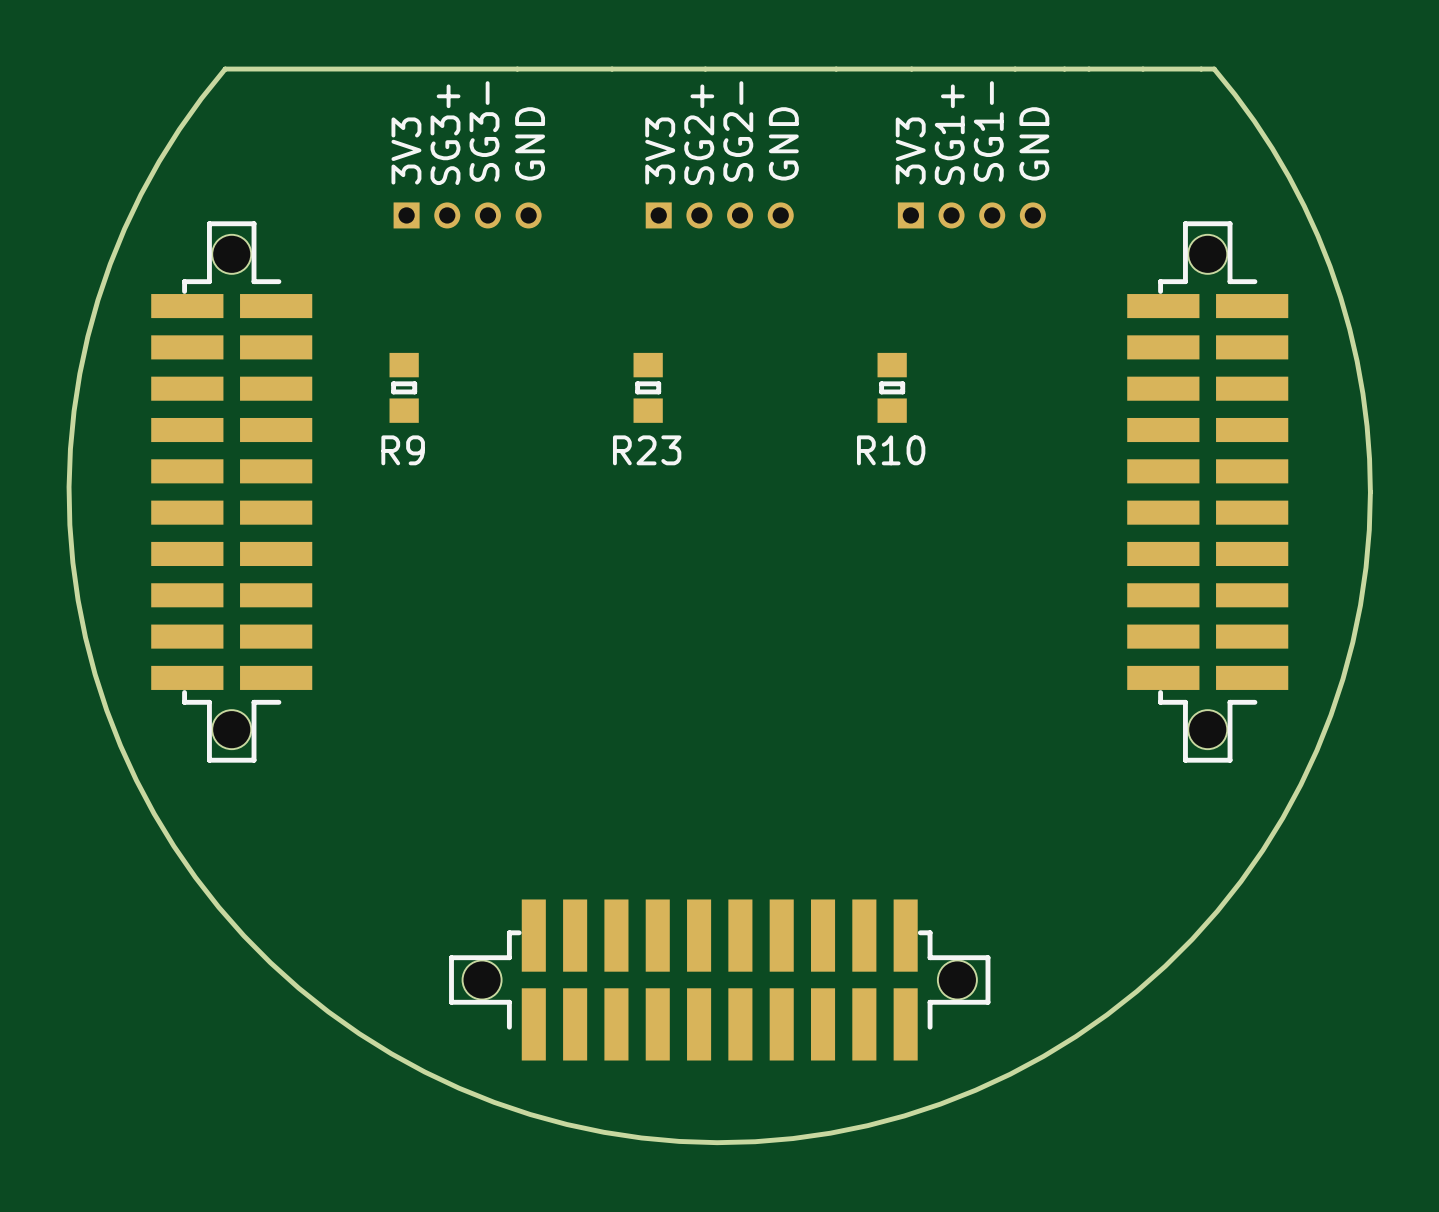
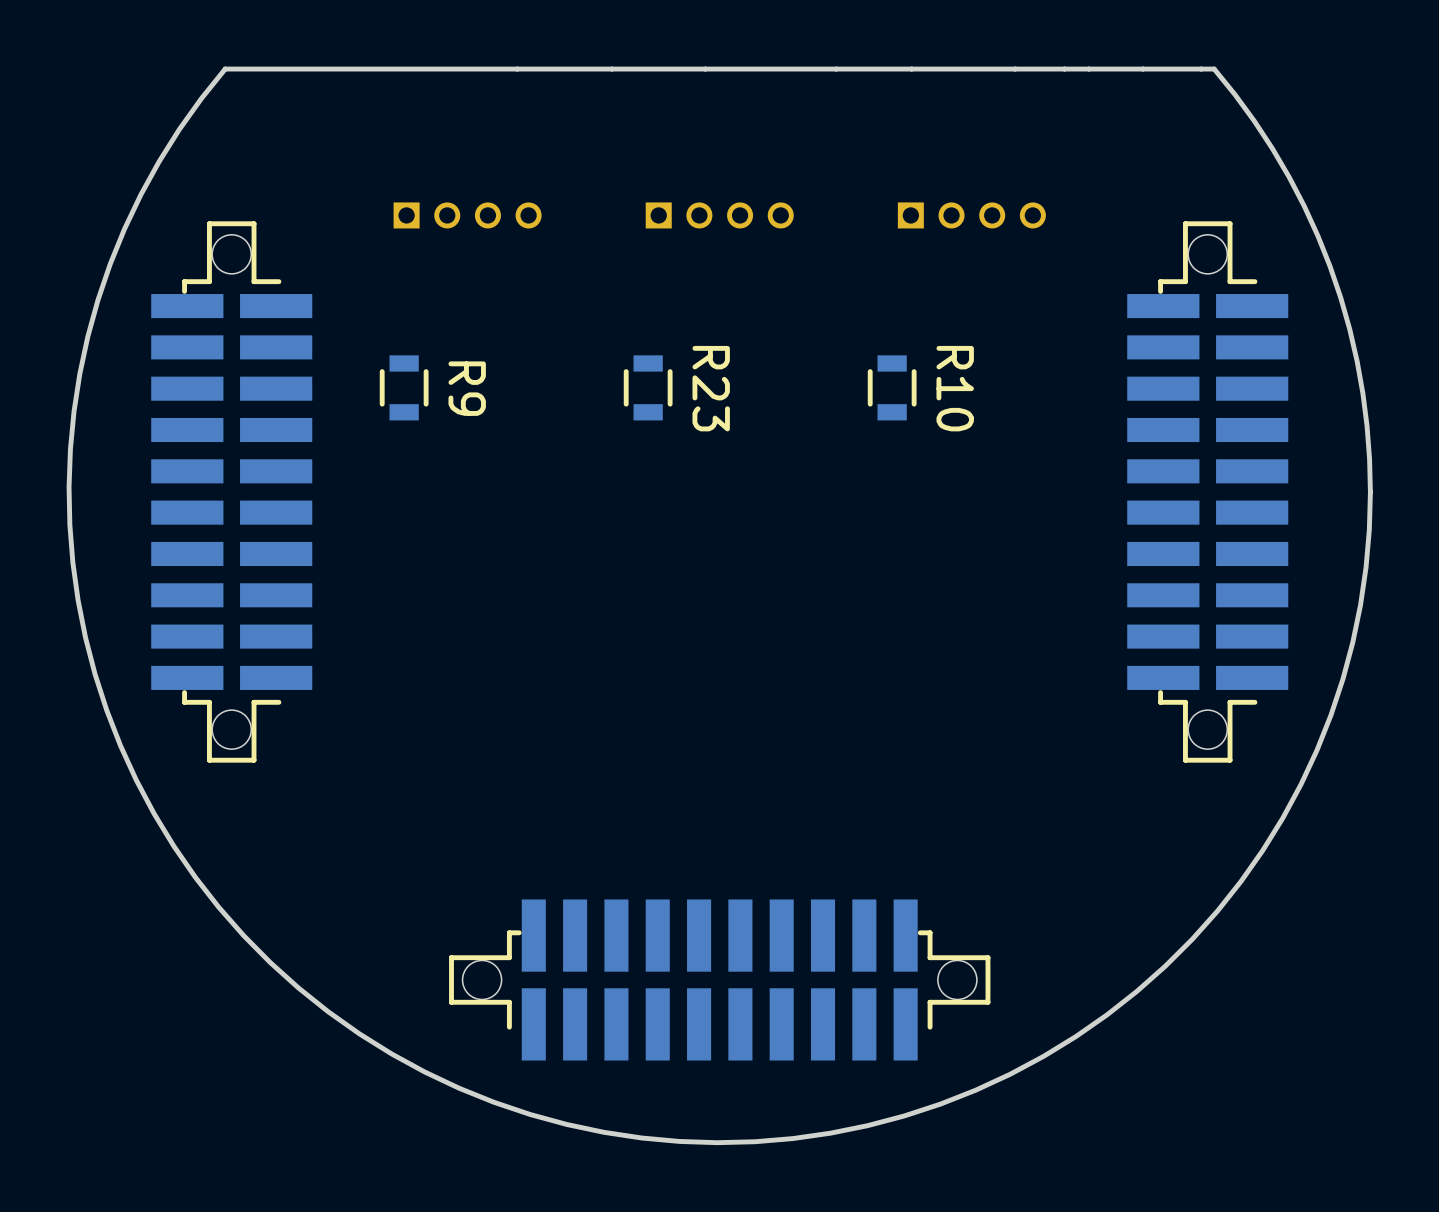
text: SG3- (484, 131) -> none
text: SG2- (738, 131) -> none
text: SG1- (988, 131) -> none
text: SG3+ (445, 134) -> none
text: SG2+ (699, 134) -> none
text: SG1+ (949, 134) -> none
text: GND (530, 143) -> none
text: GND (783, 143) -> none
text: GND (1034, 143) -> none
text: 3V3 (406, 151) -> none
text: 3V3 (660, 151) -> none
text: 3V3 (910, 151) -> none
part: (404, 387) -> none
R9: none -> (404, 387)
part: (648, 387) -> none
R23: none -> (648, 387)
part: (892, 387) -> none
R10: none -> (892, 387)
text: R9 (403, 450) -> none
text: R23 (647, 450) -> none
text: R10 (891, 450) -> none

